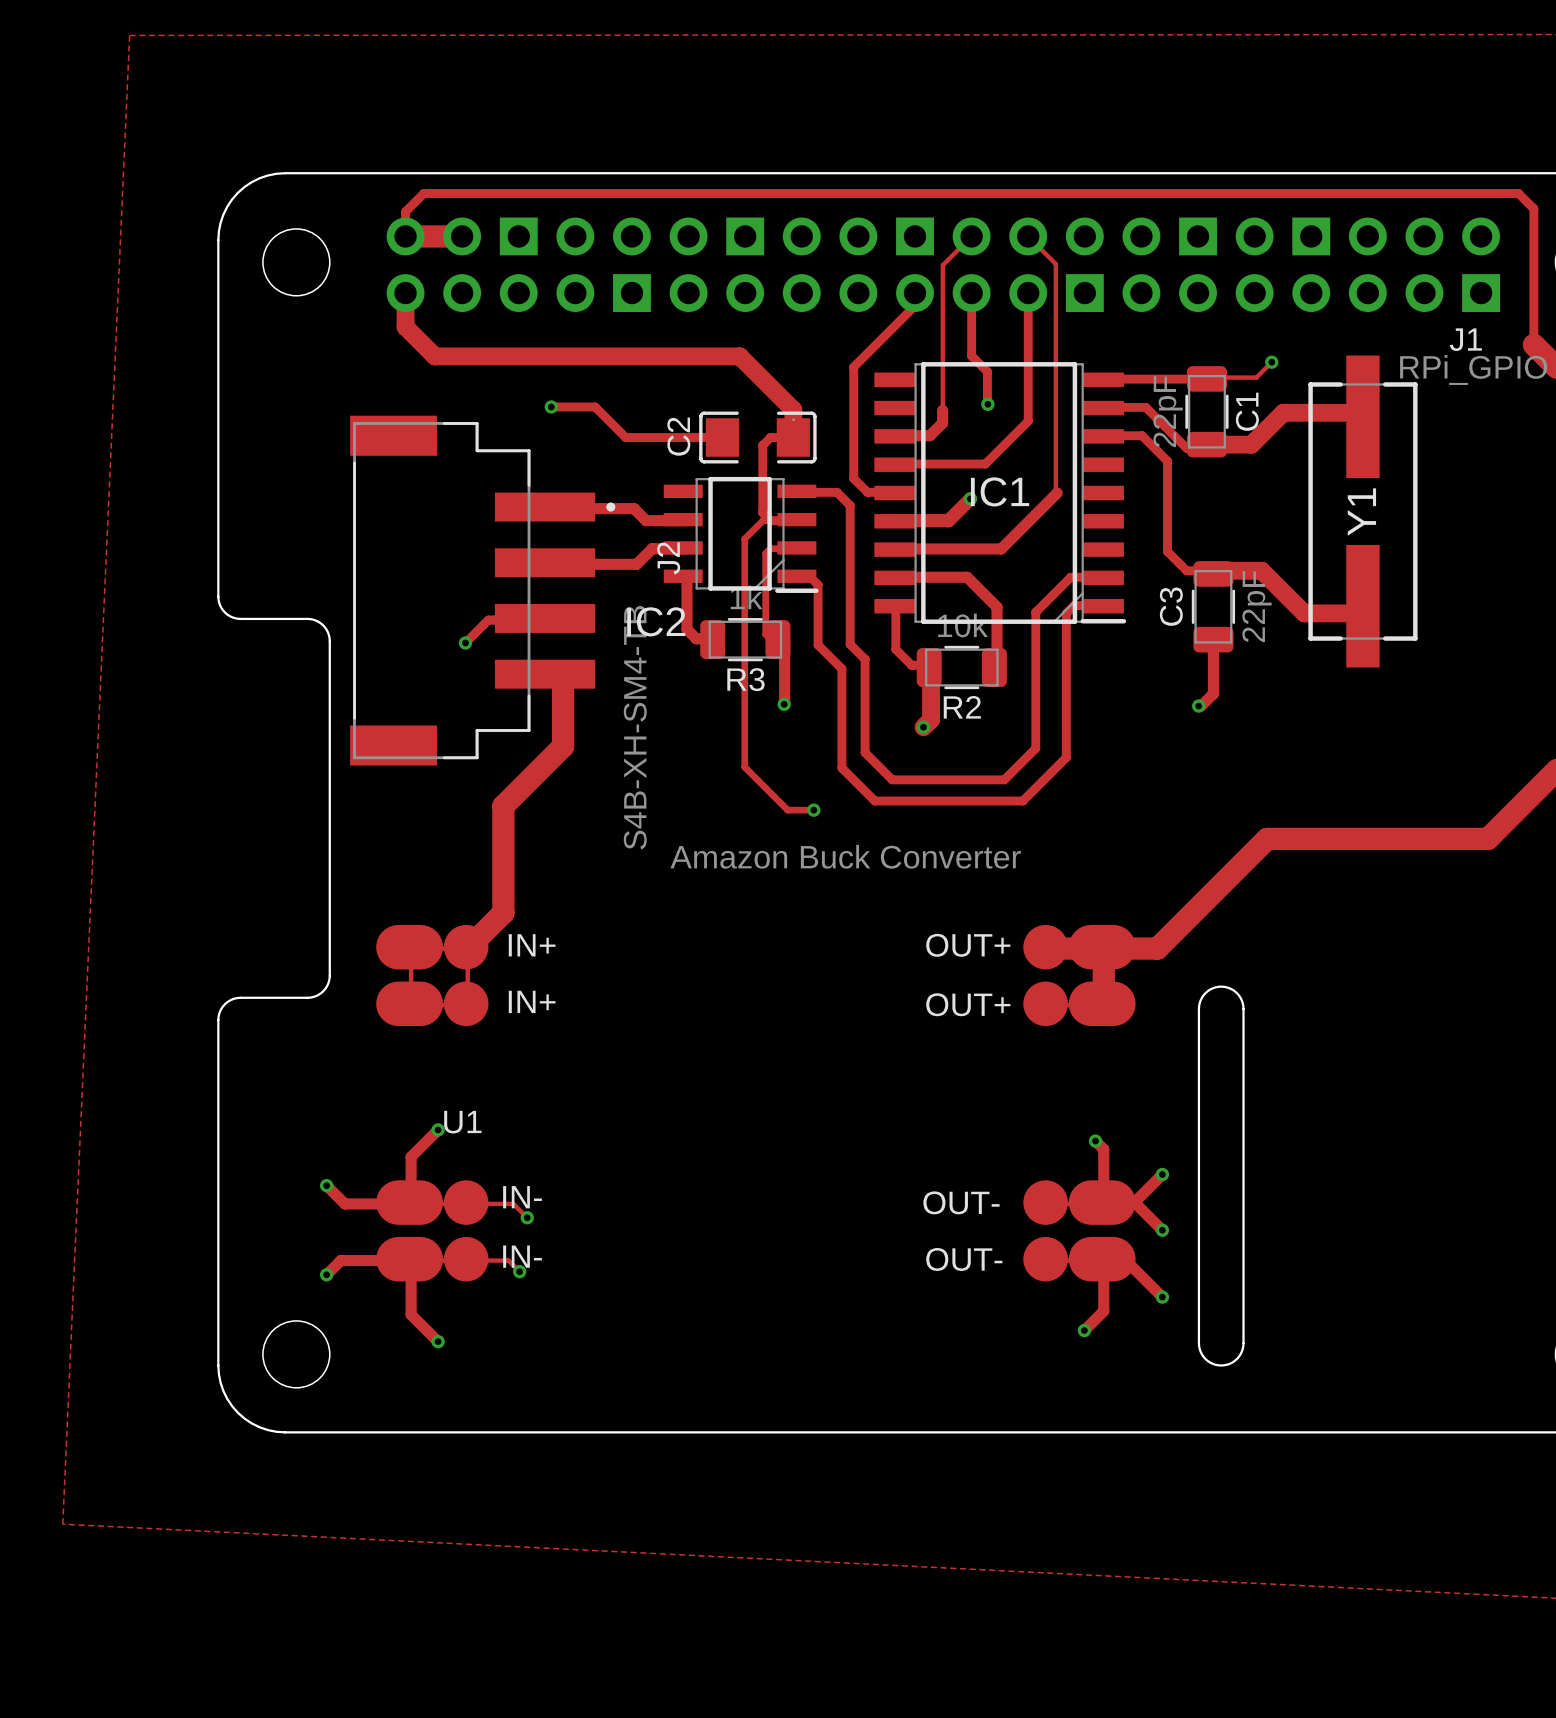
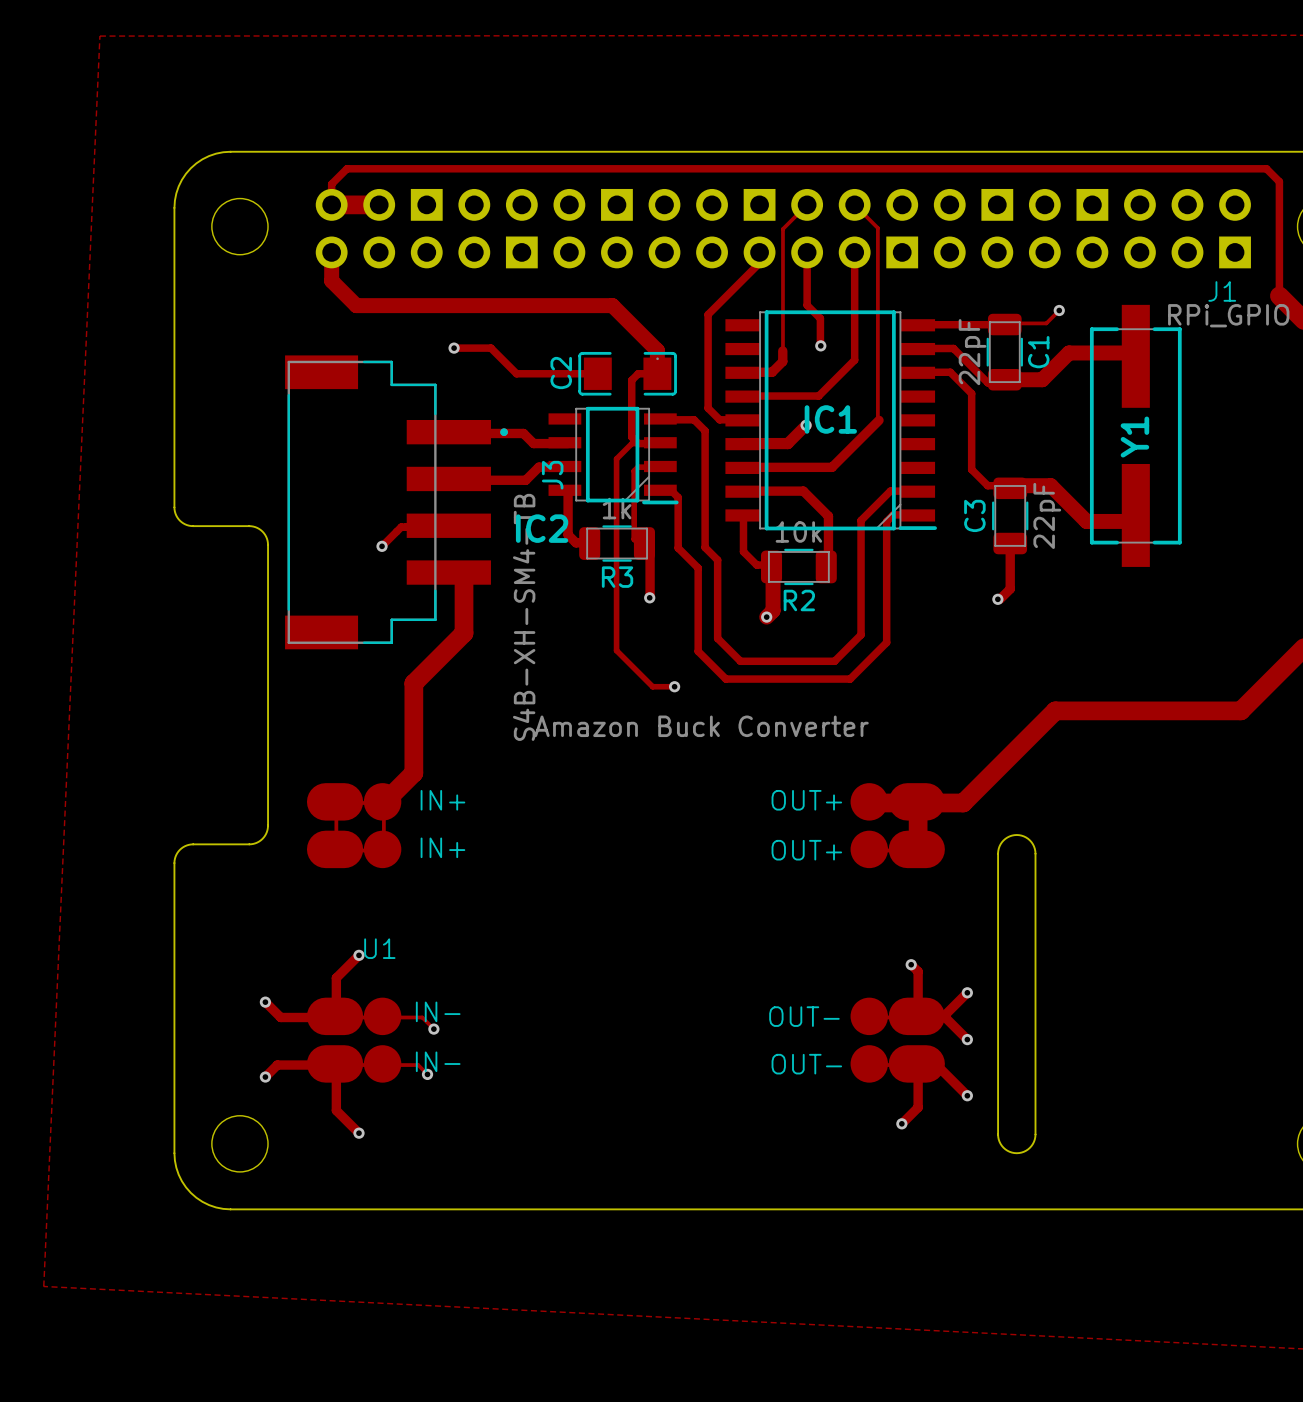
J2 name: J2 (668, 558) -> J3 (552, 475)

